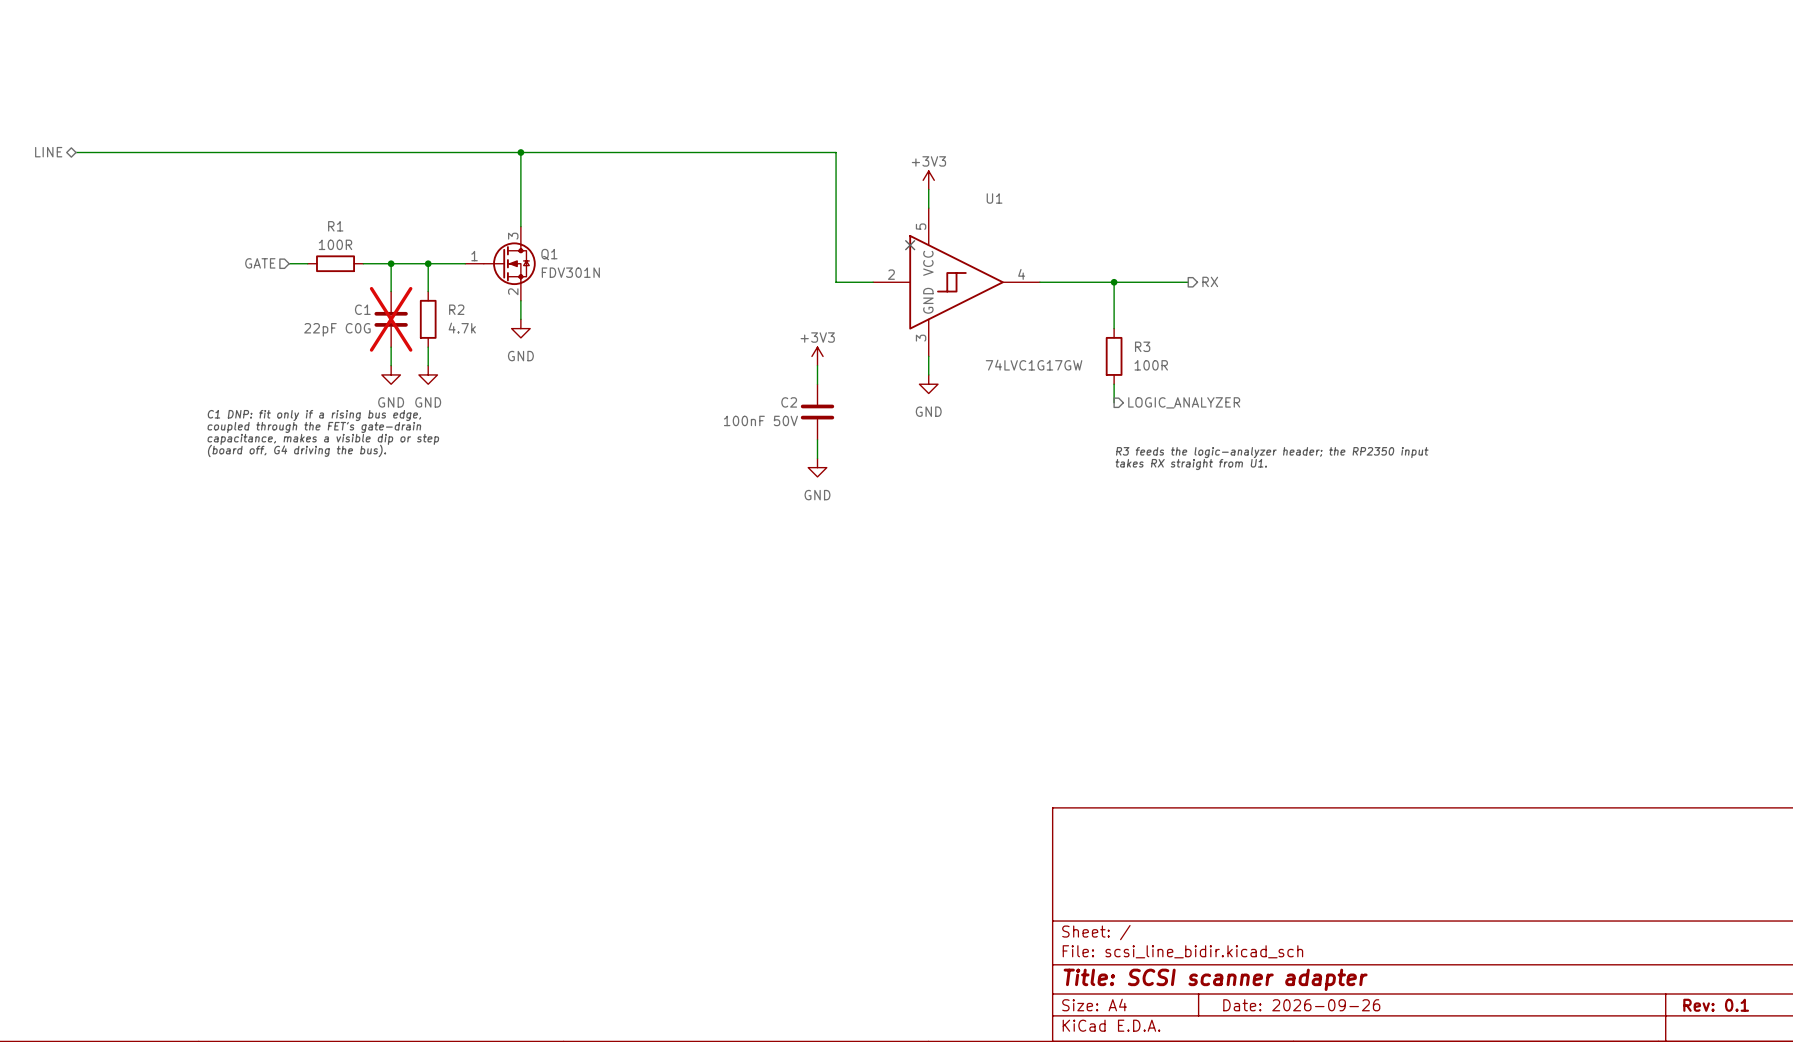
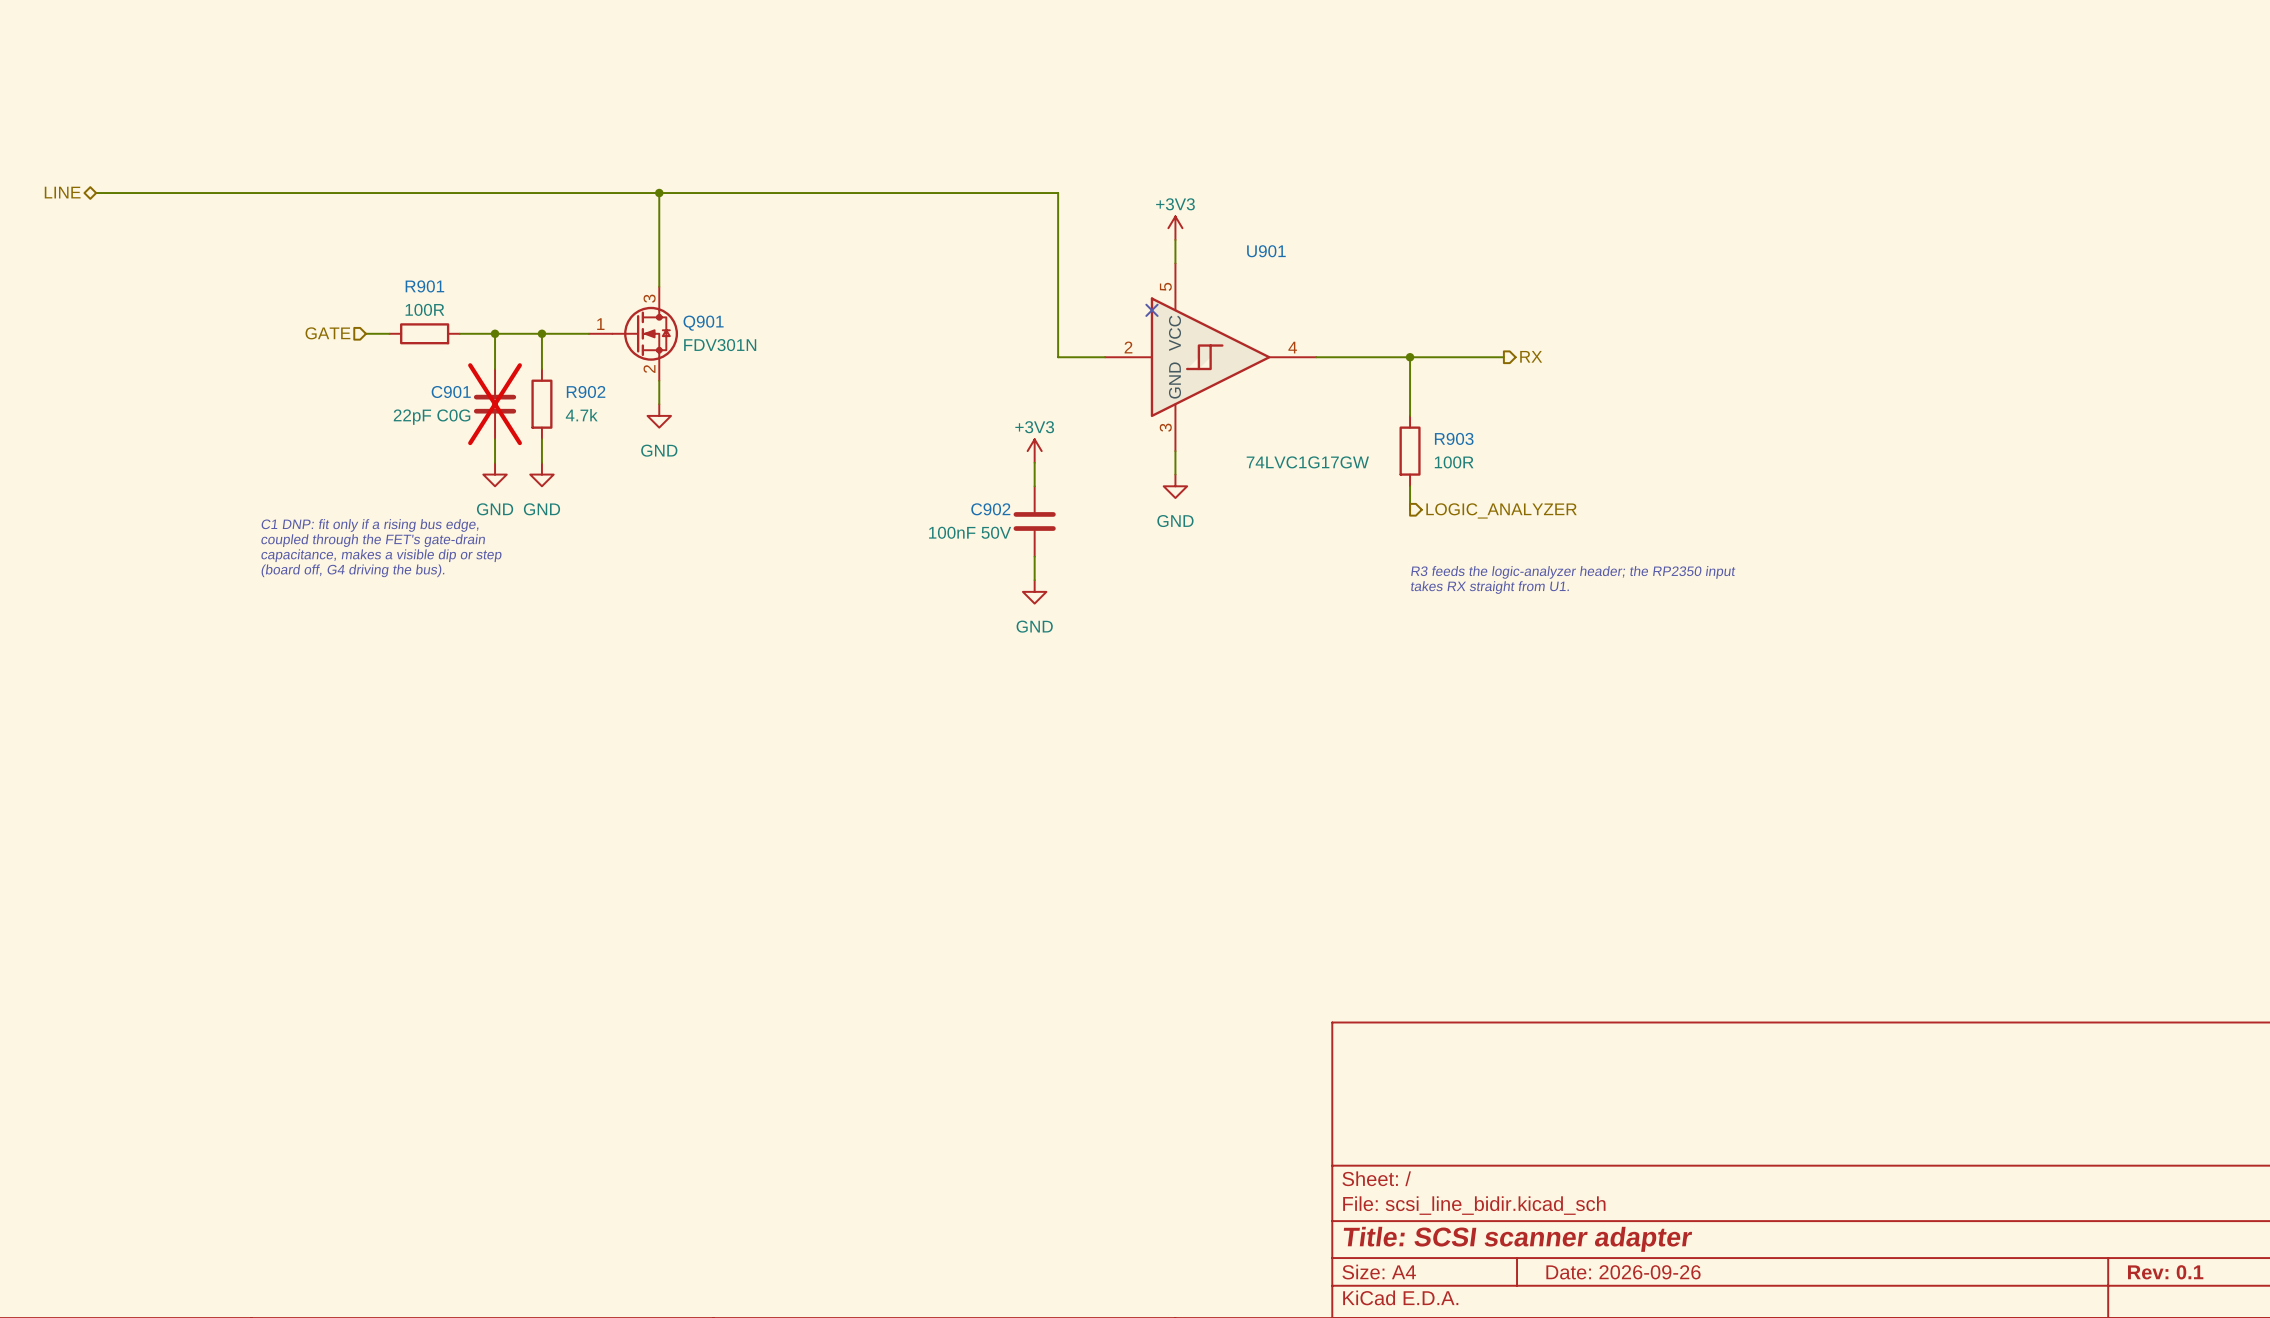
U1 name: U1 (994, 198) -> U901 (1266, 251)
R1 name: R1 (335, 226) -> R901 (424, 286)
Q1 name: Q1 (549, 254) -> Q901 (703, 323)
C1 name: C1 (362, 309) -> C901 (451, 392)
R2 name: R2 (456, 309) -> R902 (586, 392)
R3 name: R3 (1142, 346) -> R903 (1454, 438)
C2 name: C2 (789, 402) -> C902 (990, 509)

